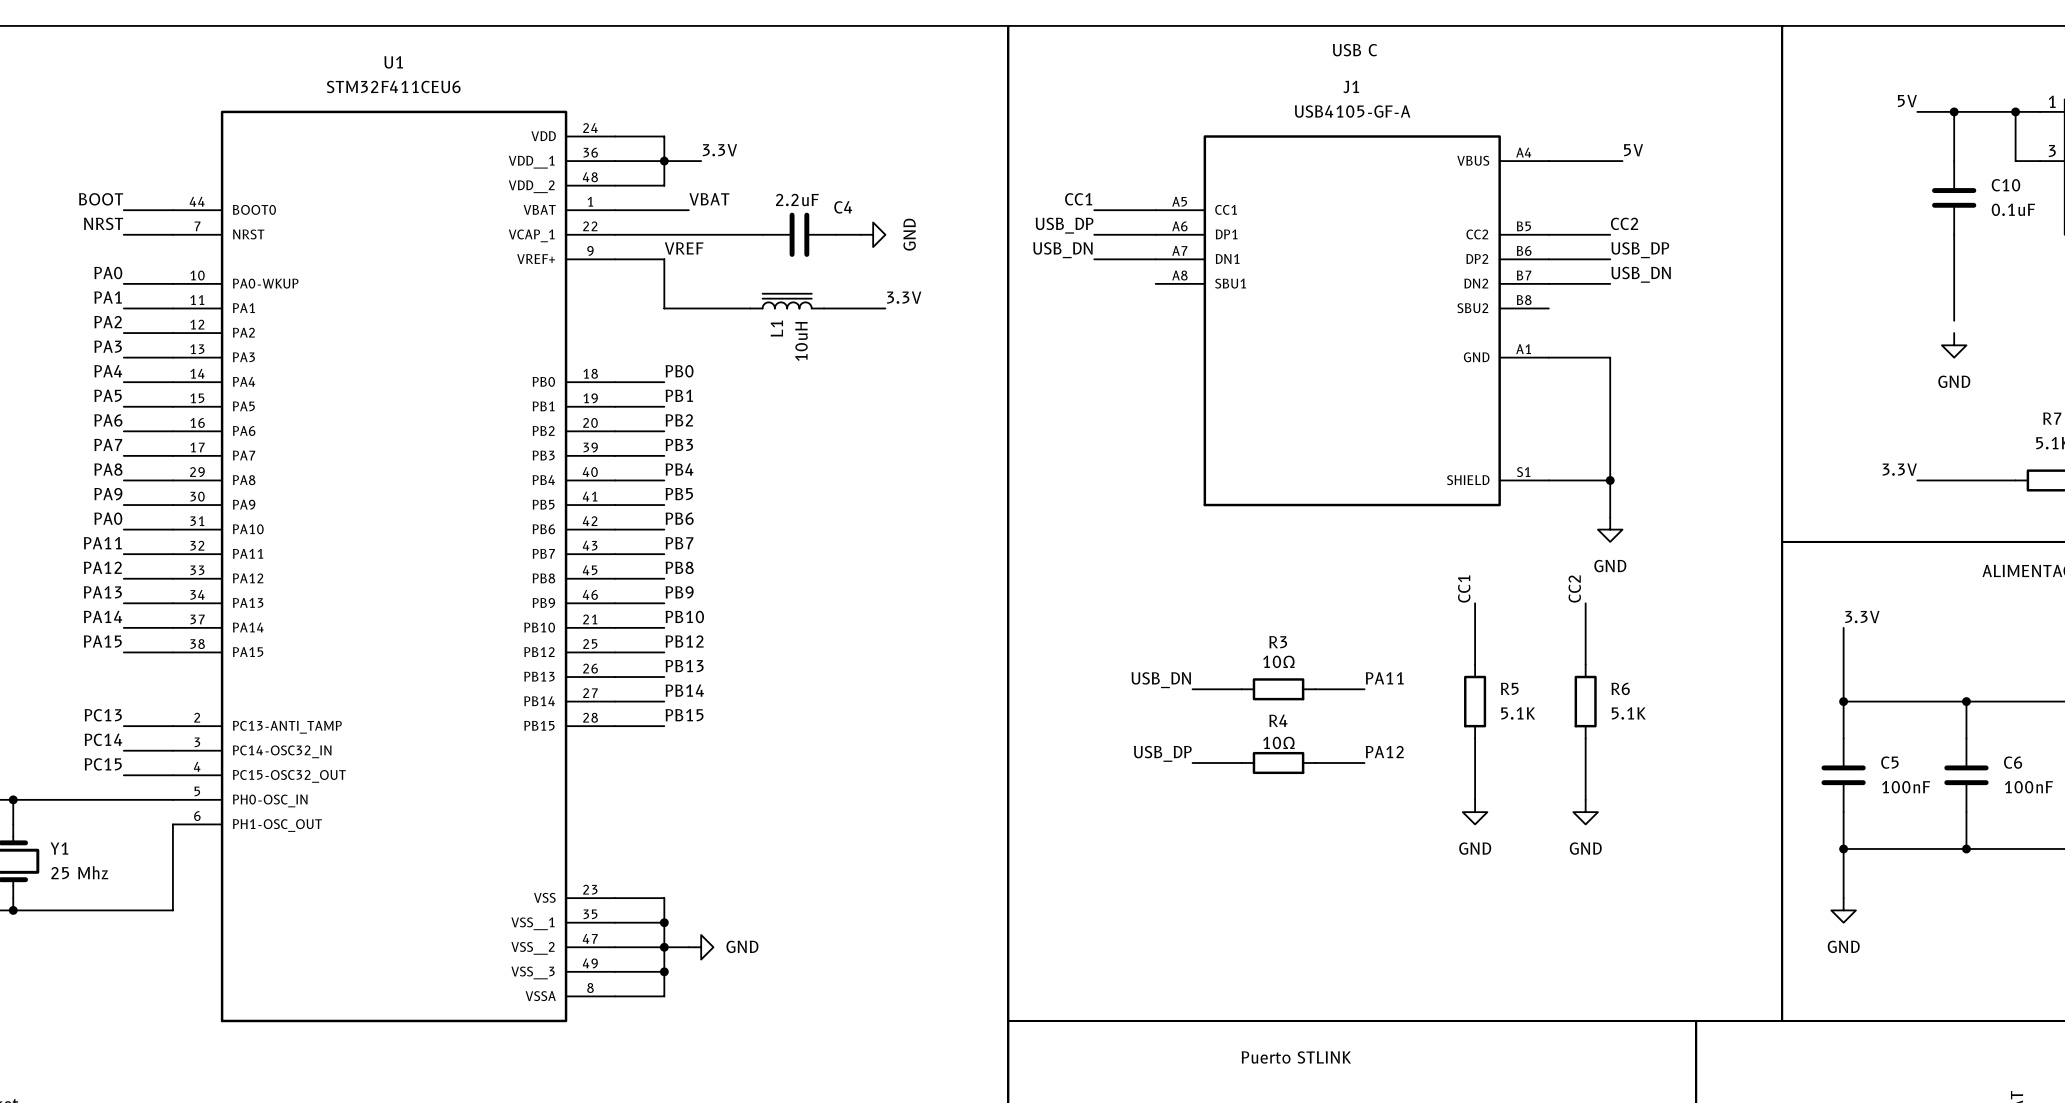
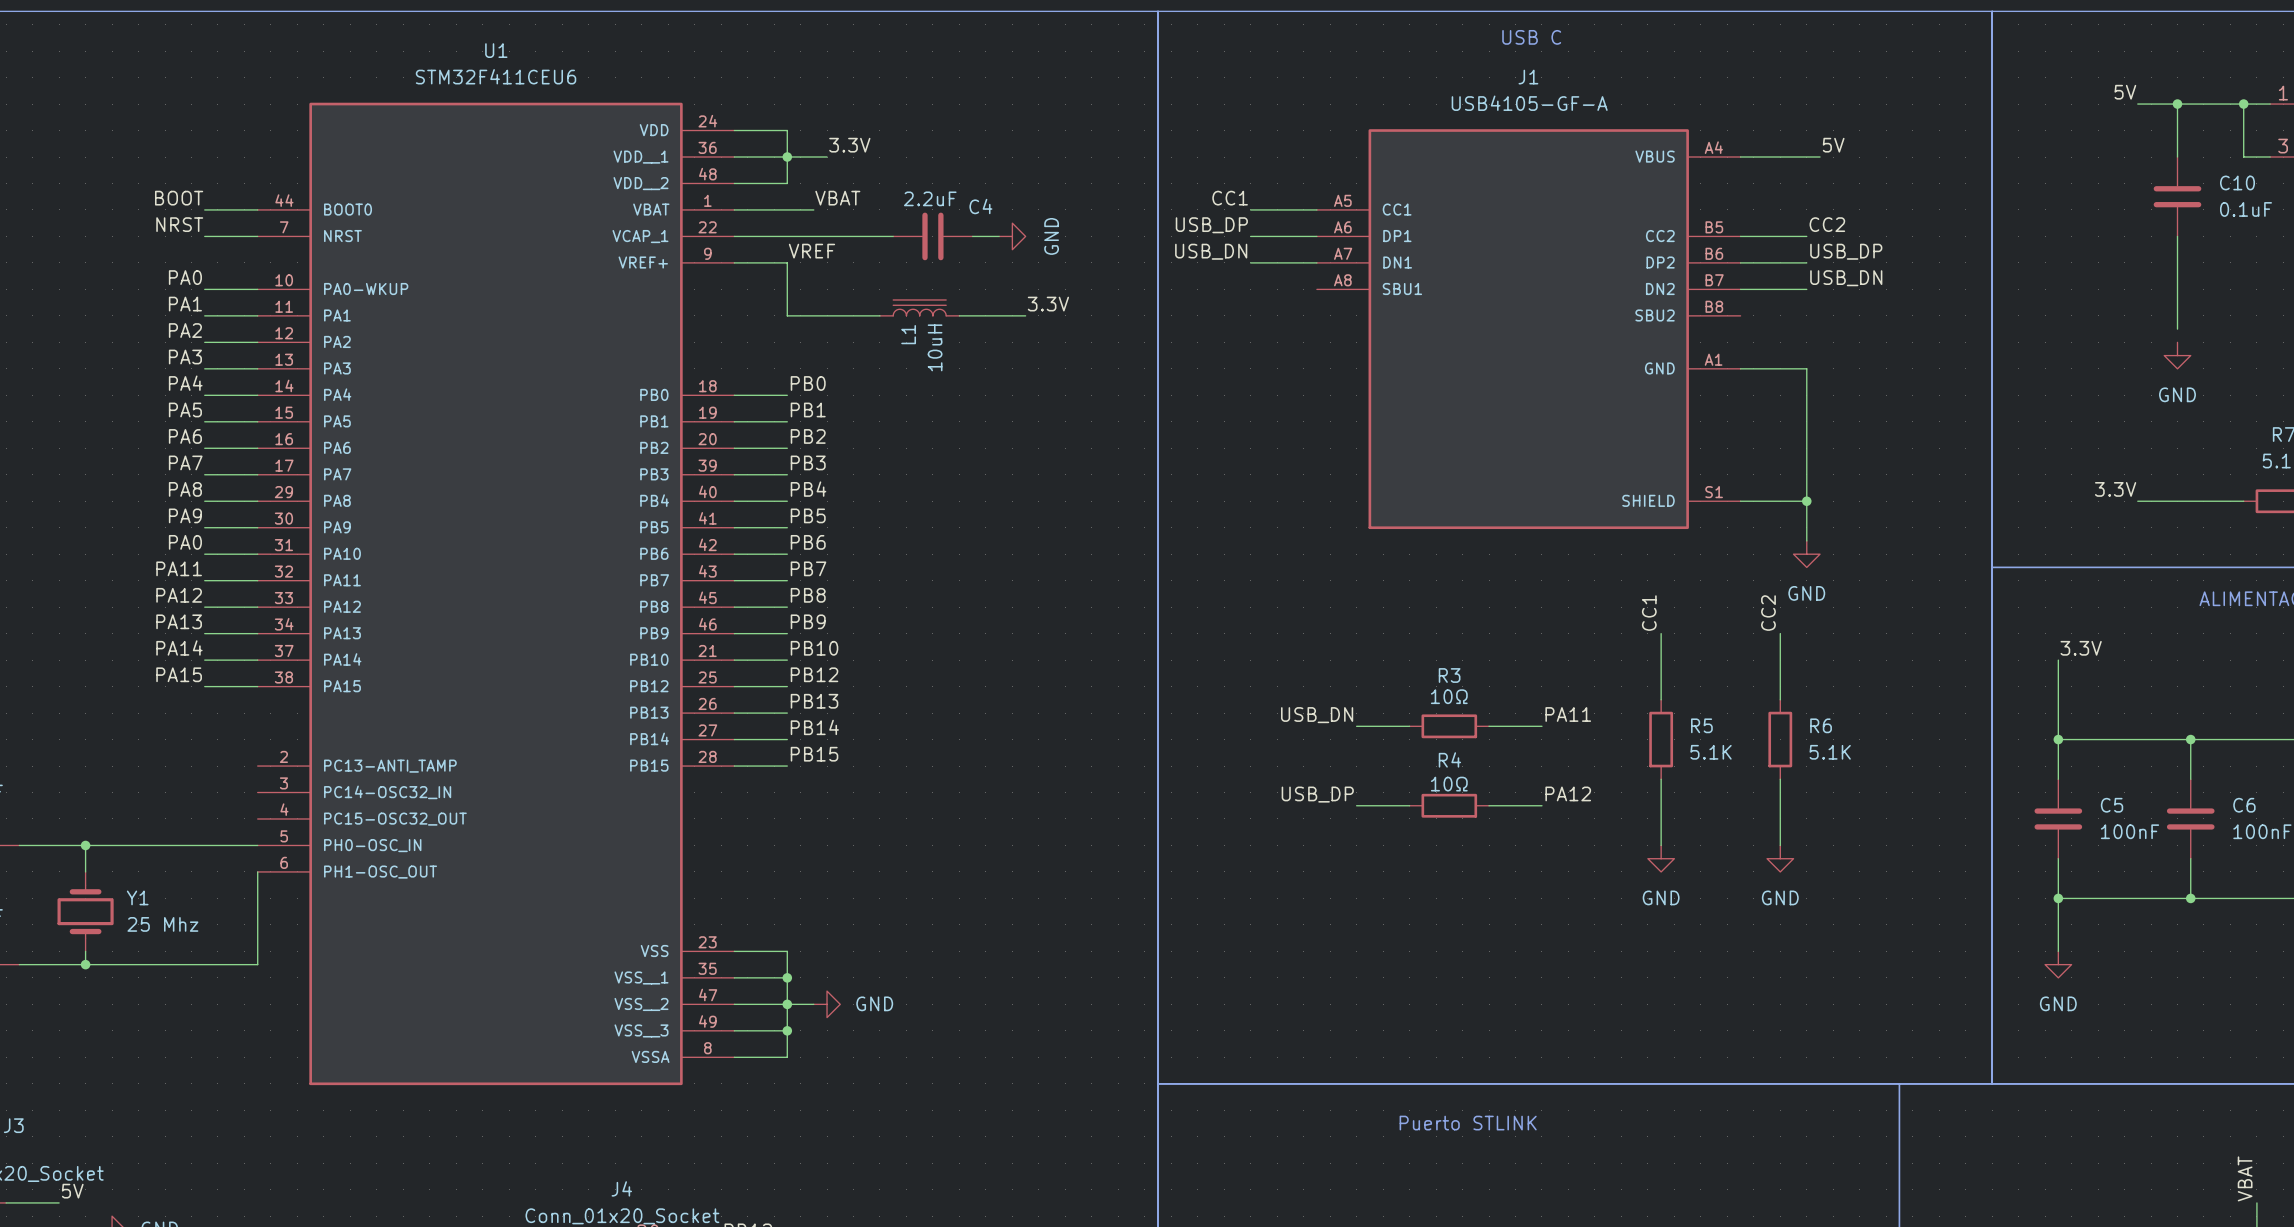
label: PC13 (103, 715) -> none
wire: (123, 726) (172, 726) -> none
label: PC14 (103, 739) -> none
wire: (123, 750) (172, 750) -> none
label: PC15 (103, 764) -> none
wire: (123, 775) (172, 775) -> none

